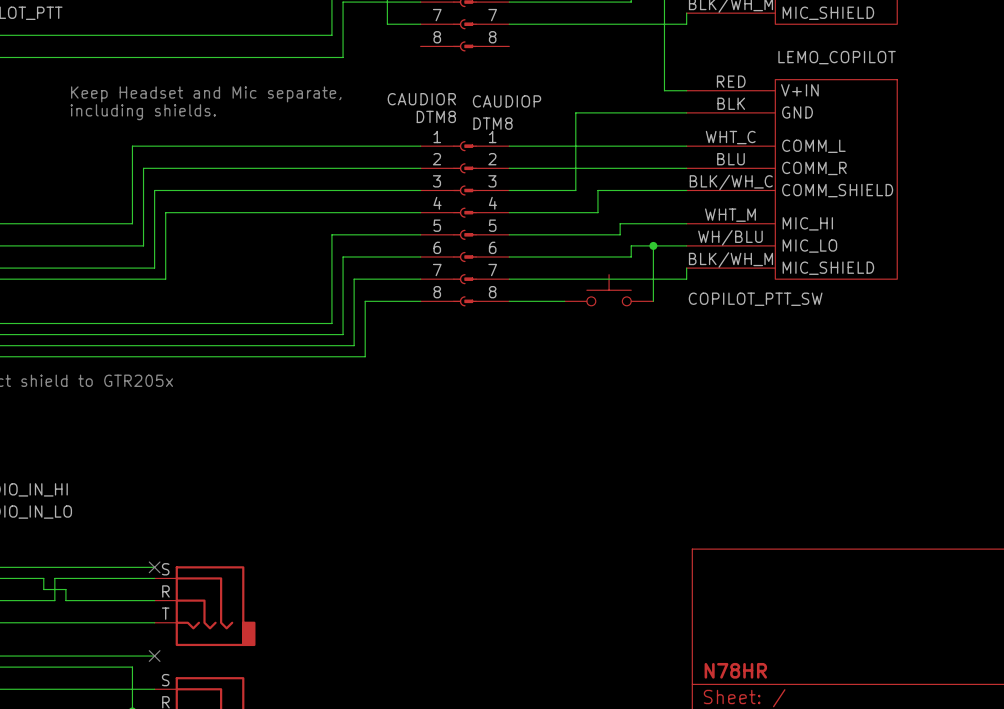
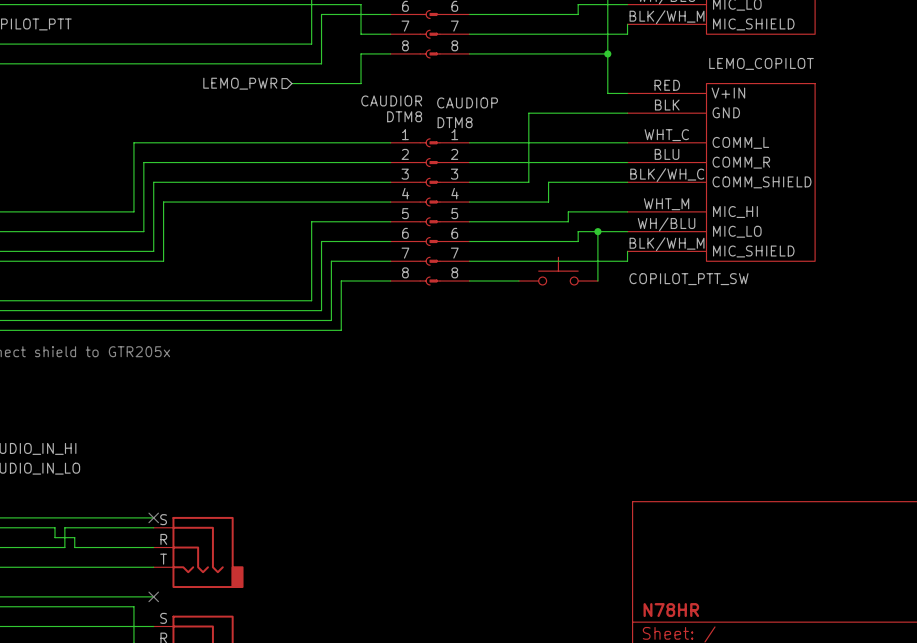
wire: none -> (390, 53) (361, 53) (361, 83) (291, 83)
wire: none -> (469, 53) (607, 53)
junction: none -> (607, 53)
hierarchical label: none -> LEMO_PWR (240, 83)
text: Keep Headset and Mic separate, (206, 94) -> none
text: including shields. (143, 112) -> none

